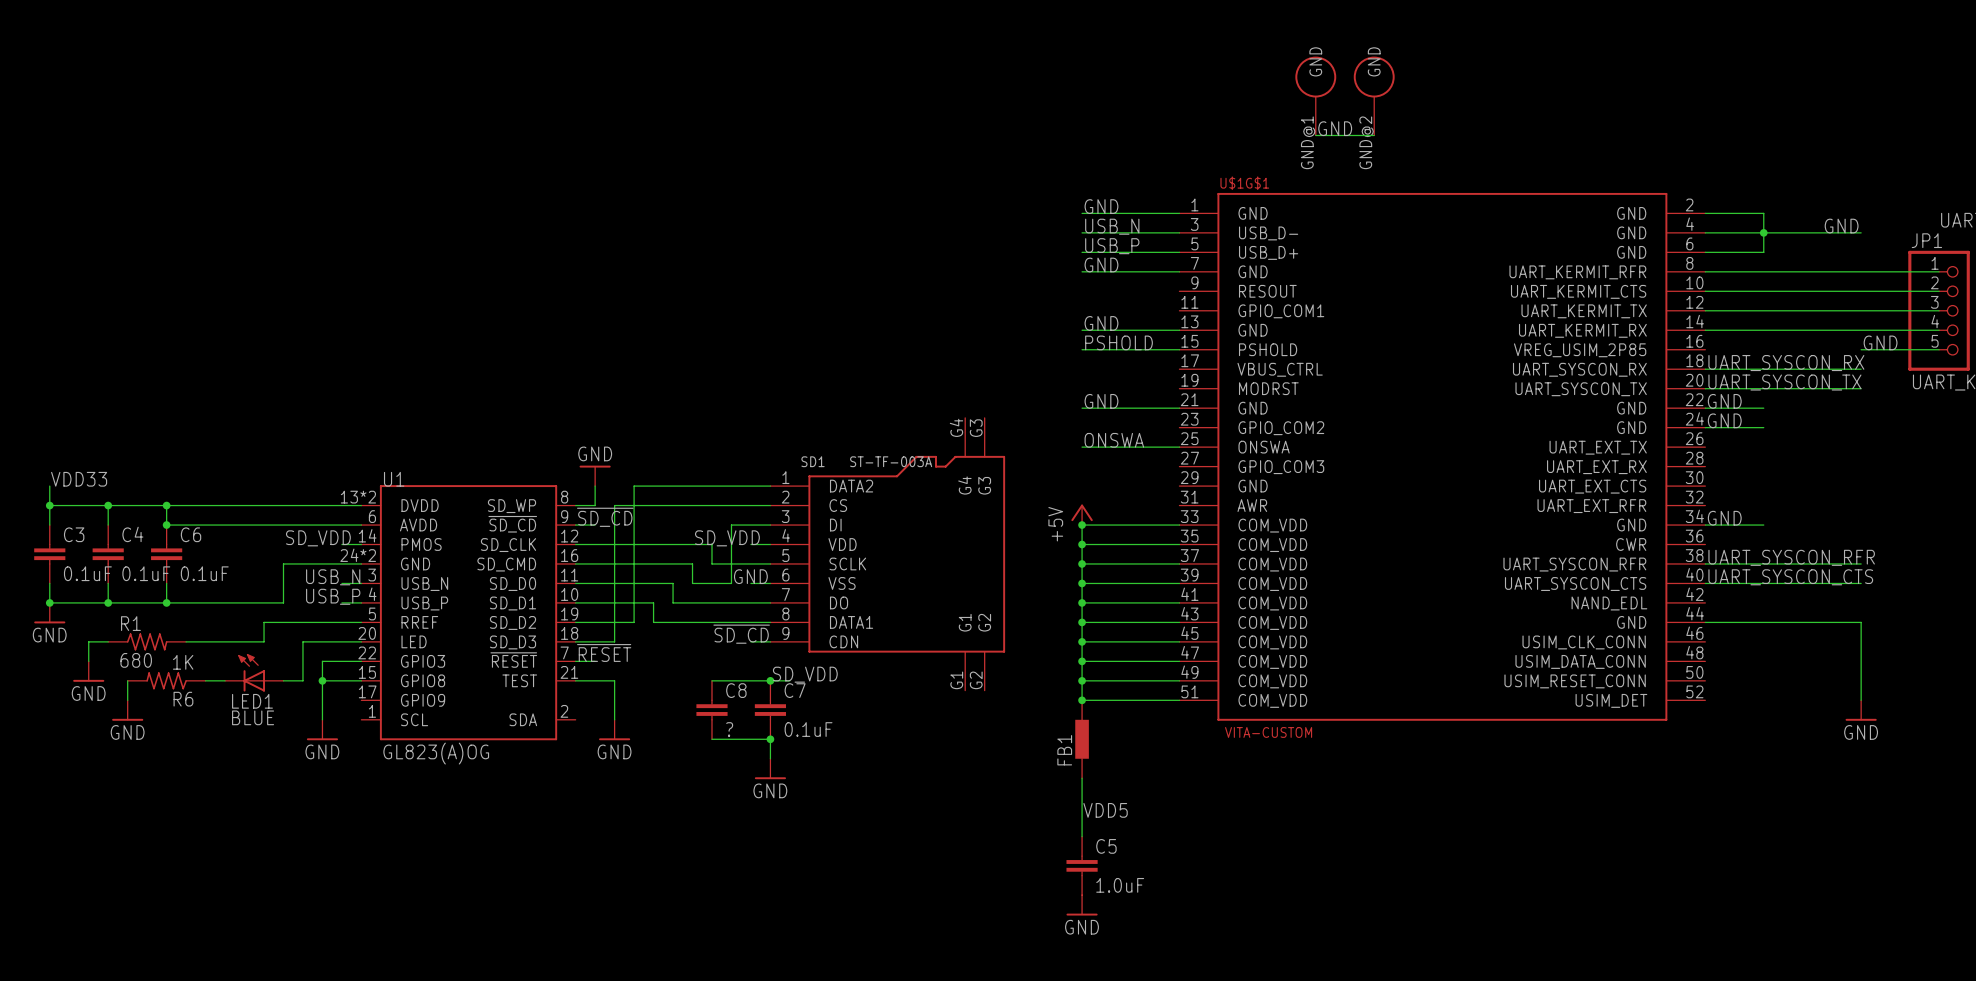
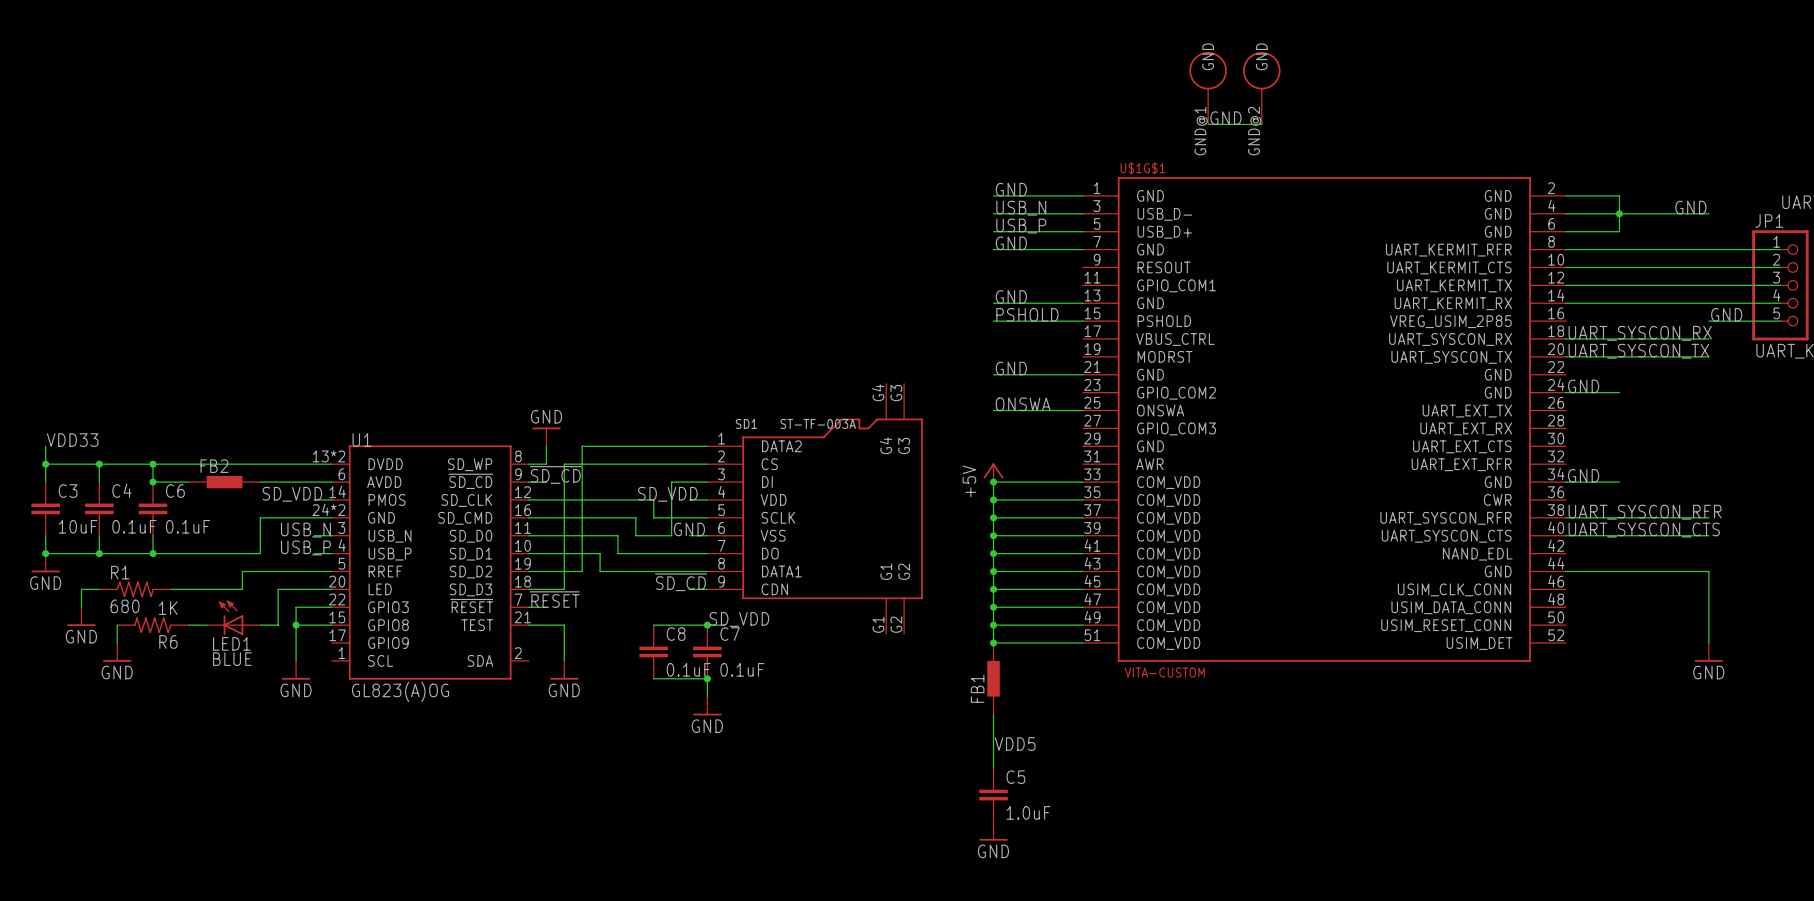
label: GND (1724, 401) -> none
wire: (1705, 408) (1763, 408) -> none
FB2: none -> (224, 482)
C3 value: 0.1uF (87, 573) -> 10uF (78, 526)
C8 value: ? (729, 729) -> 0.1uF (688, 669)

